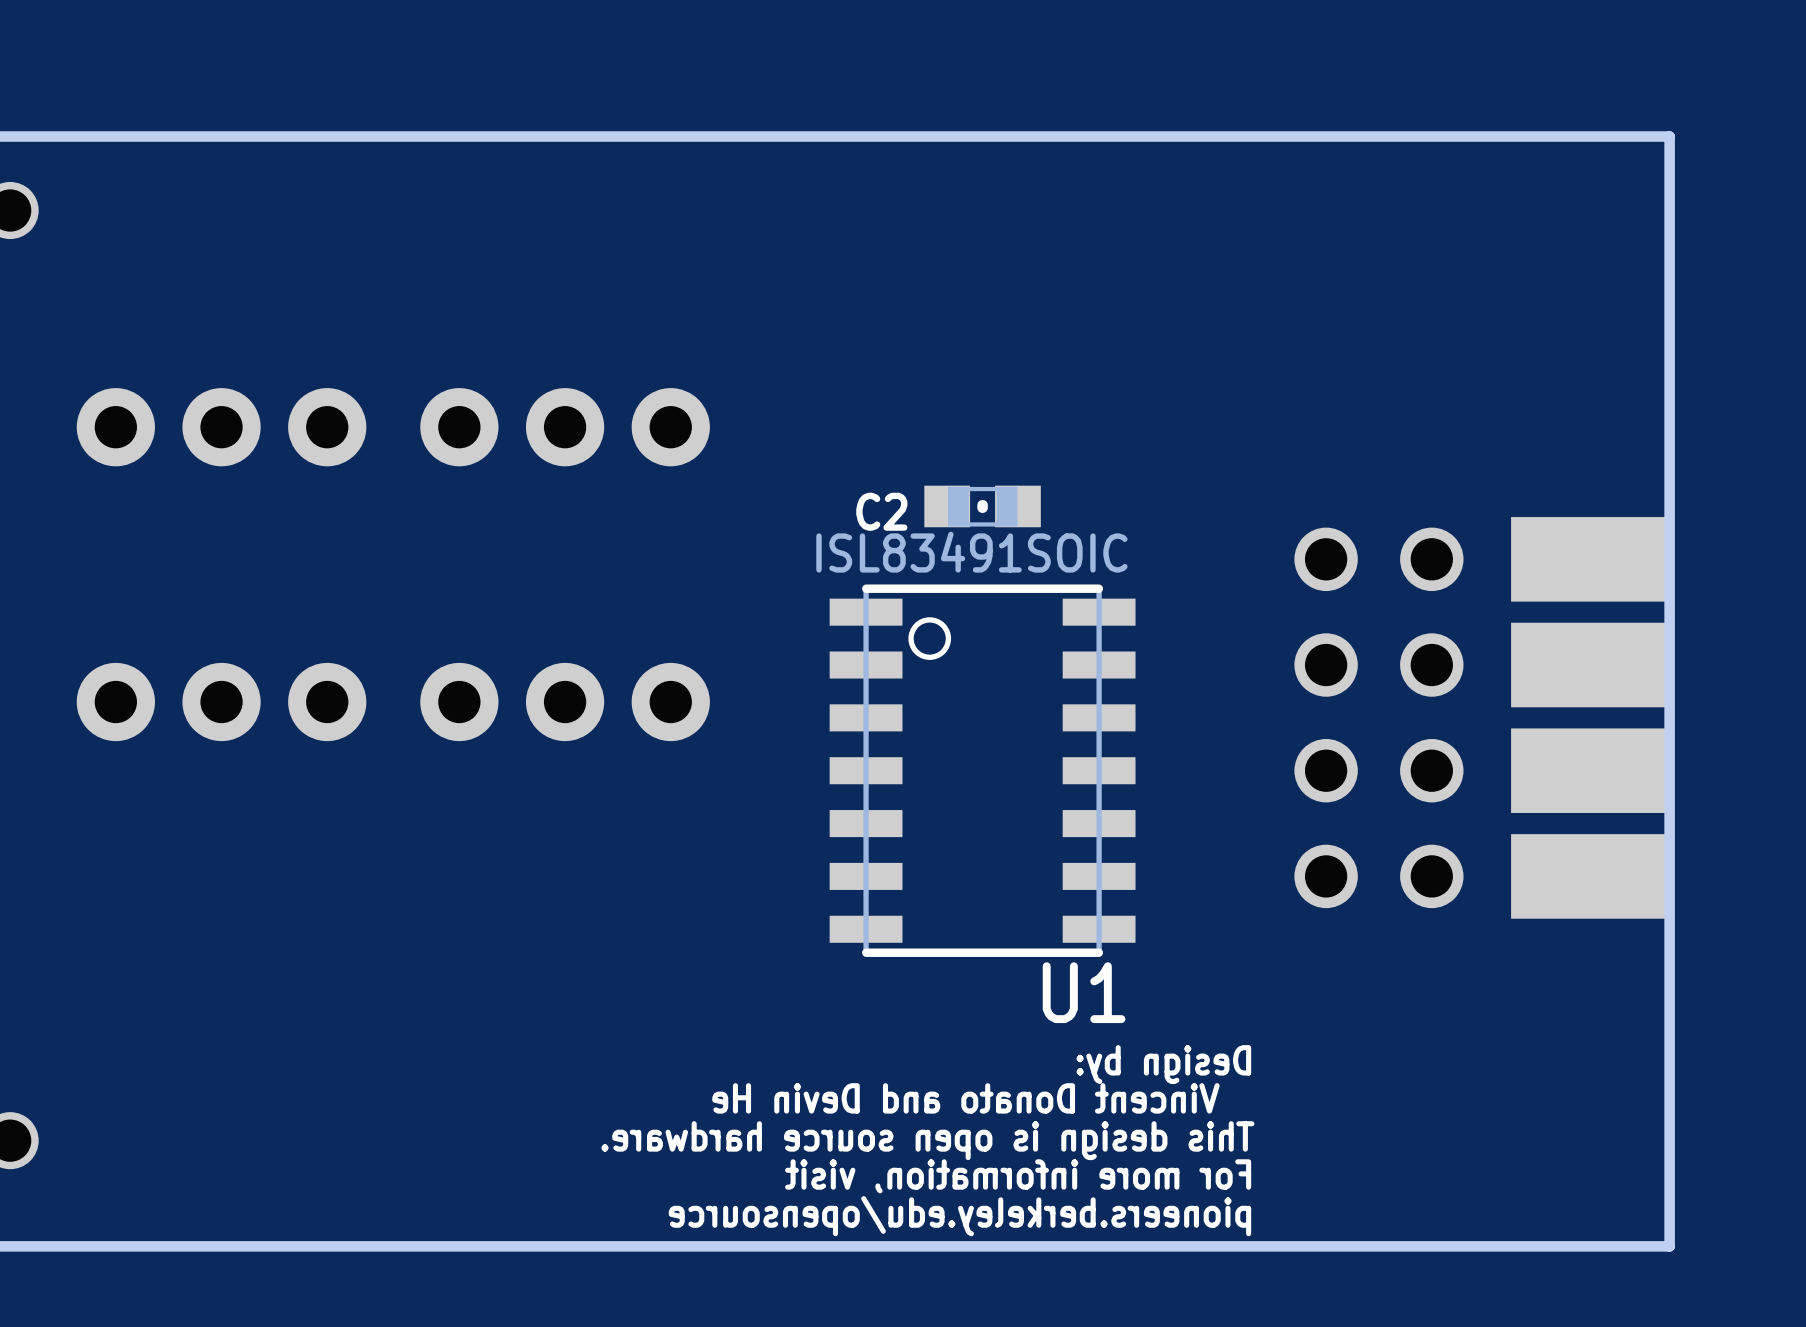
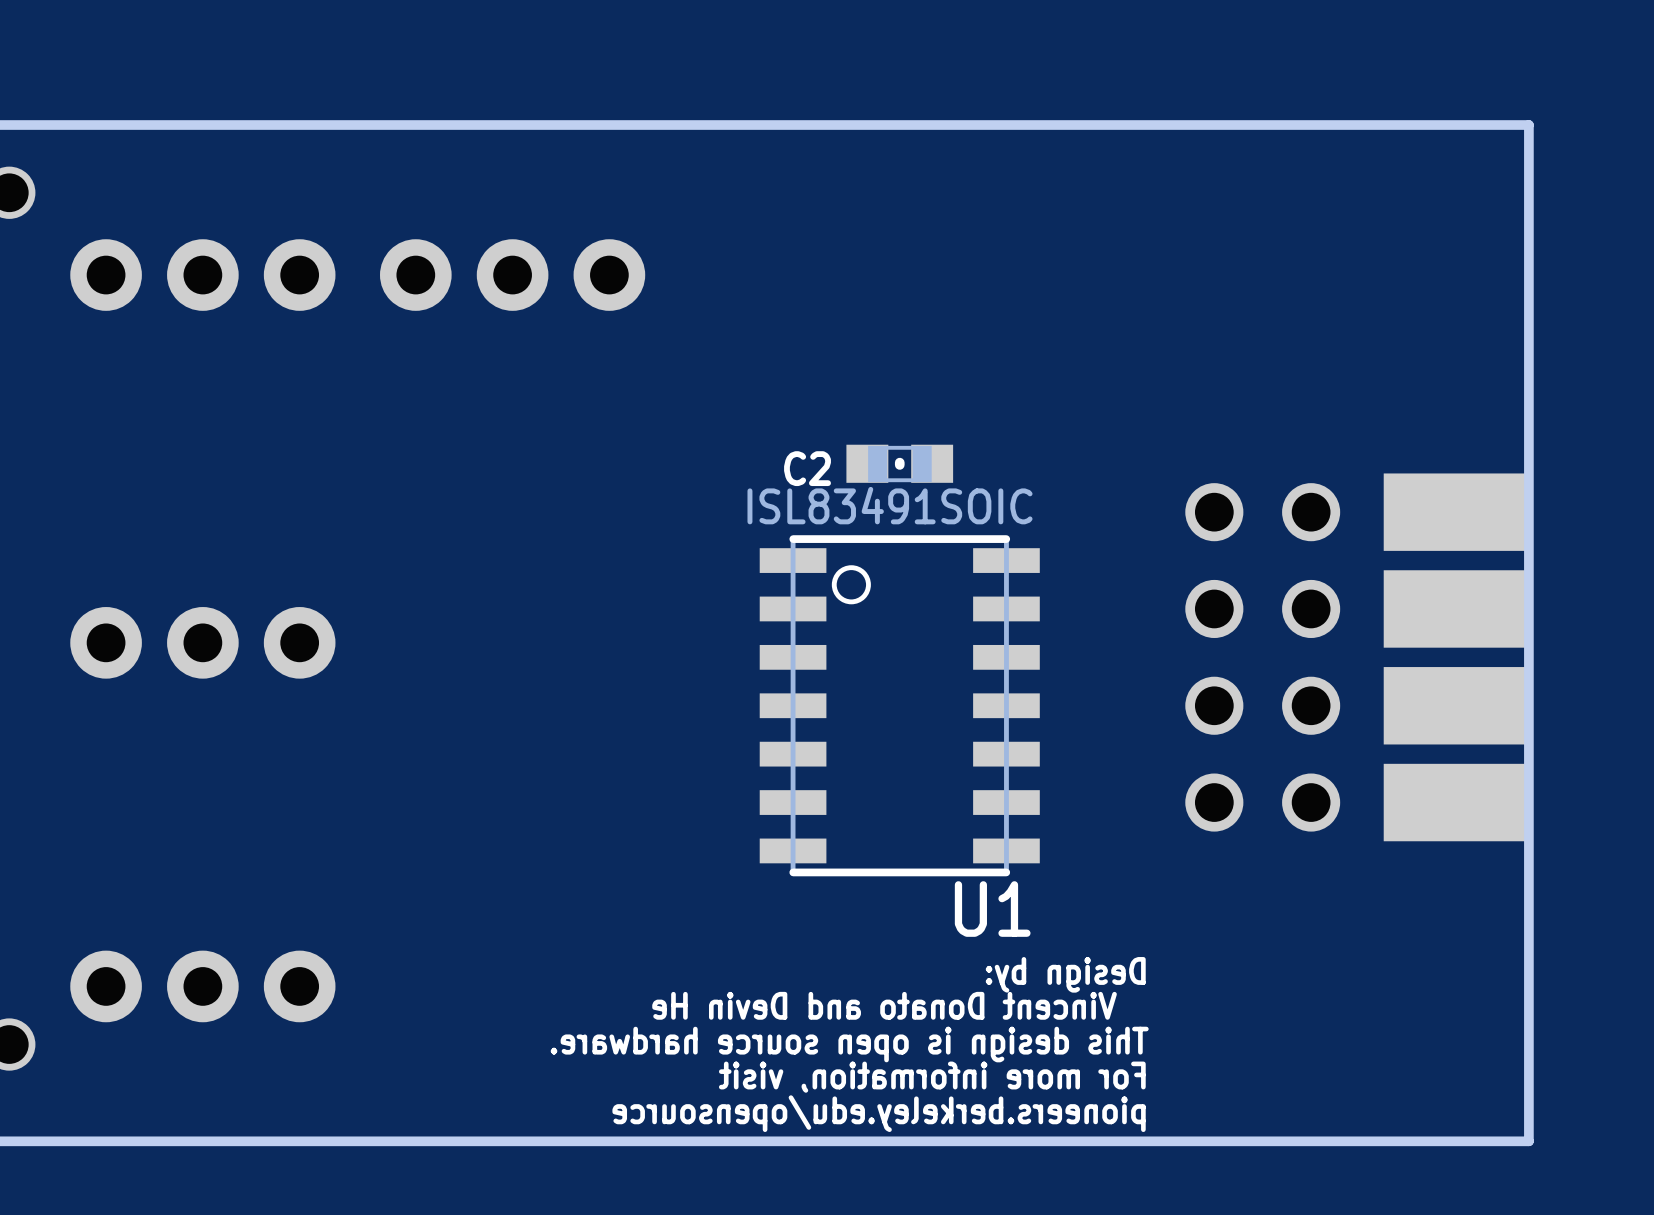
part position: (221, 427) -> (202, 275)
part position: (565, 427) -> (512, 275)
part: (565, 702) -> none
part: none -> (202, 986)

